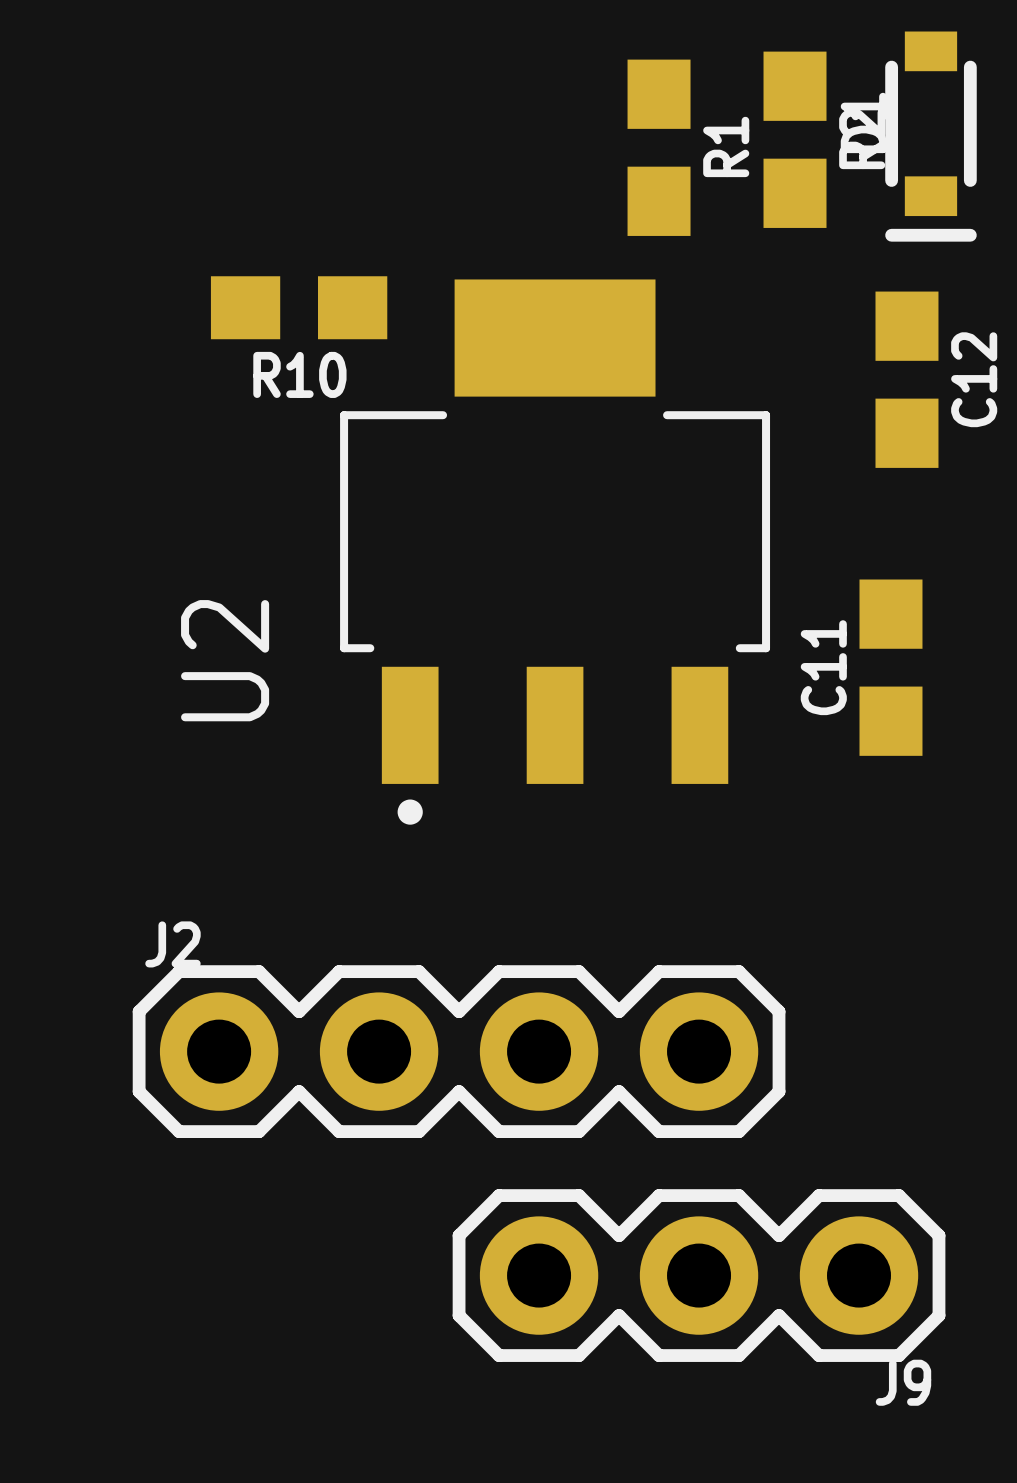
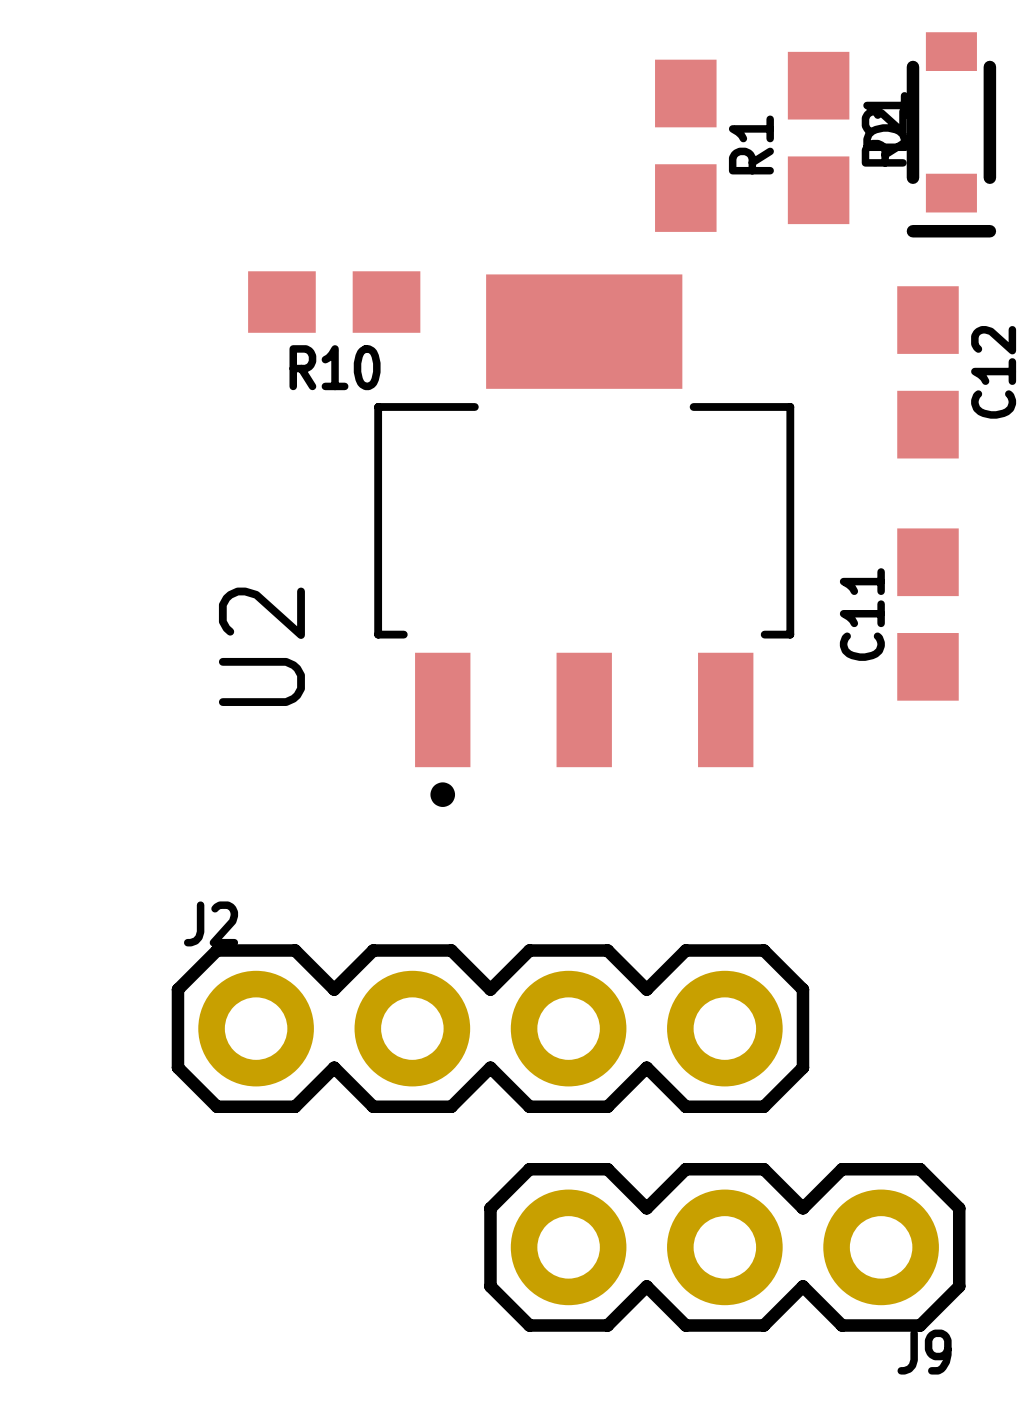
C11 position: (890, 667) -> (927, 614)

